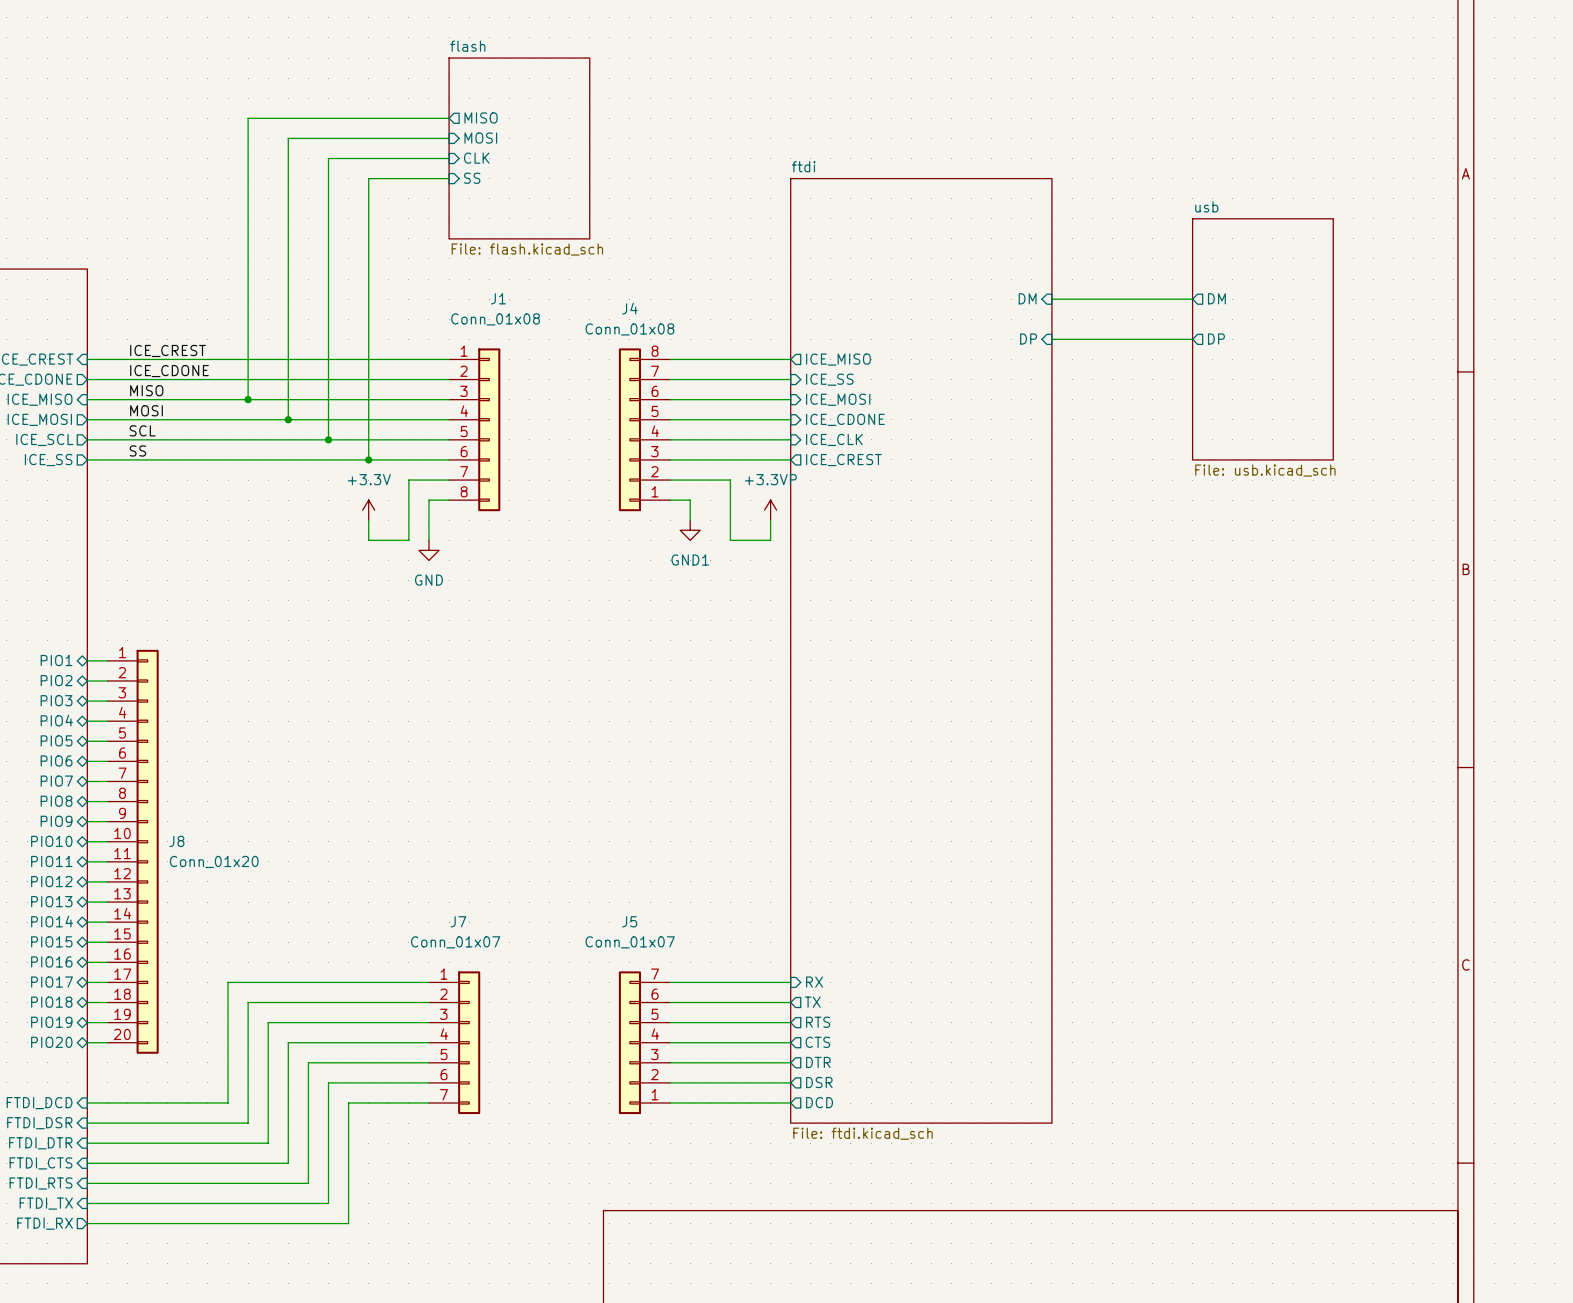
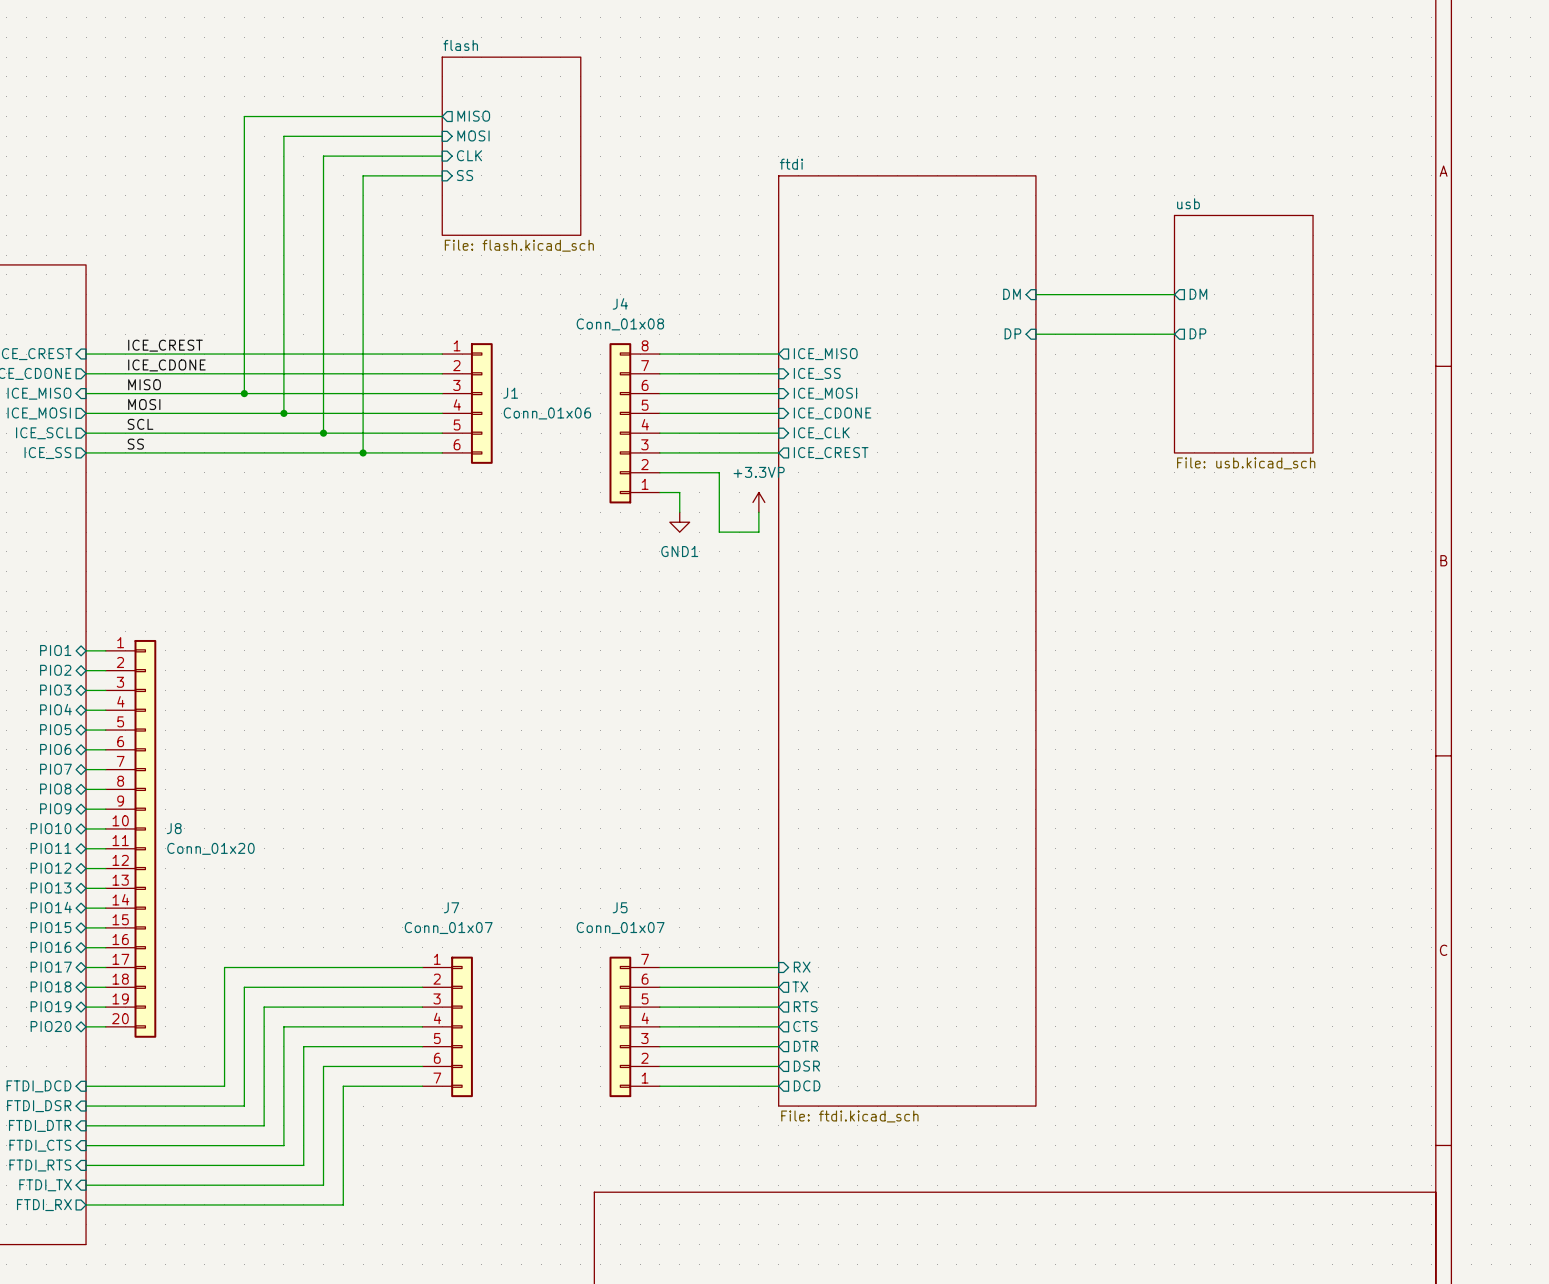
J1 name position: J1 (498, 298) -> J1 (510, 393)
J1 value: Conn_01x08 (495, 319) -> Conn_01x06 (547, 413)
J1 symbol: [449, 348, 501, 512] -> [442, 343, 493, 464]
wire: (449, 480) (408, 480) (408, 540) (368, 540) (368, 520) -> none
wire: (449, 500) (428, 500) (428, 540) -> none
power symbol: +3.3V (368, 510) -> none
power symbol: GND (428, 550) -> none

